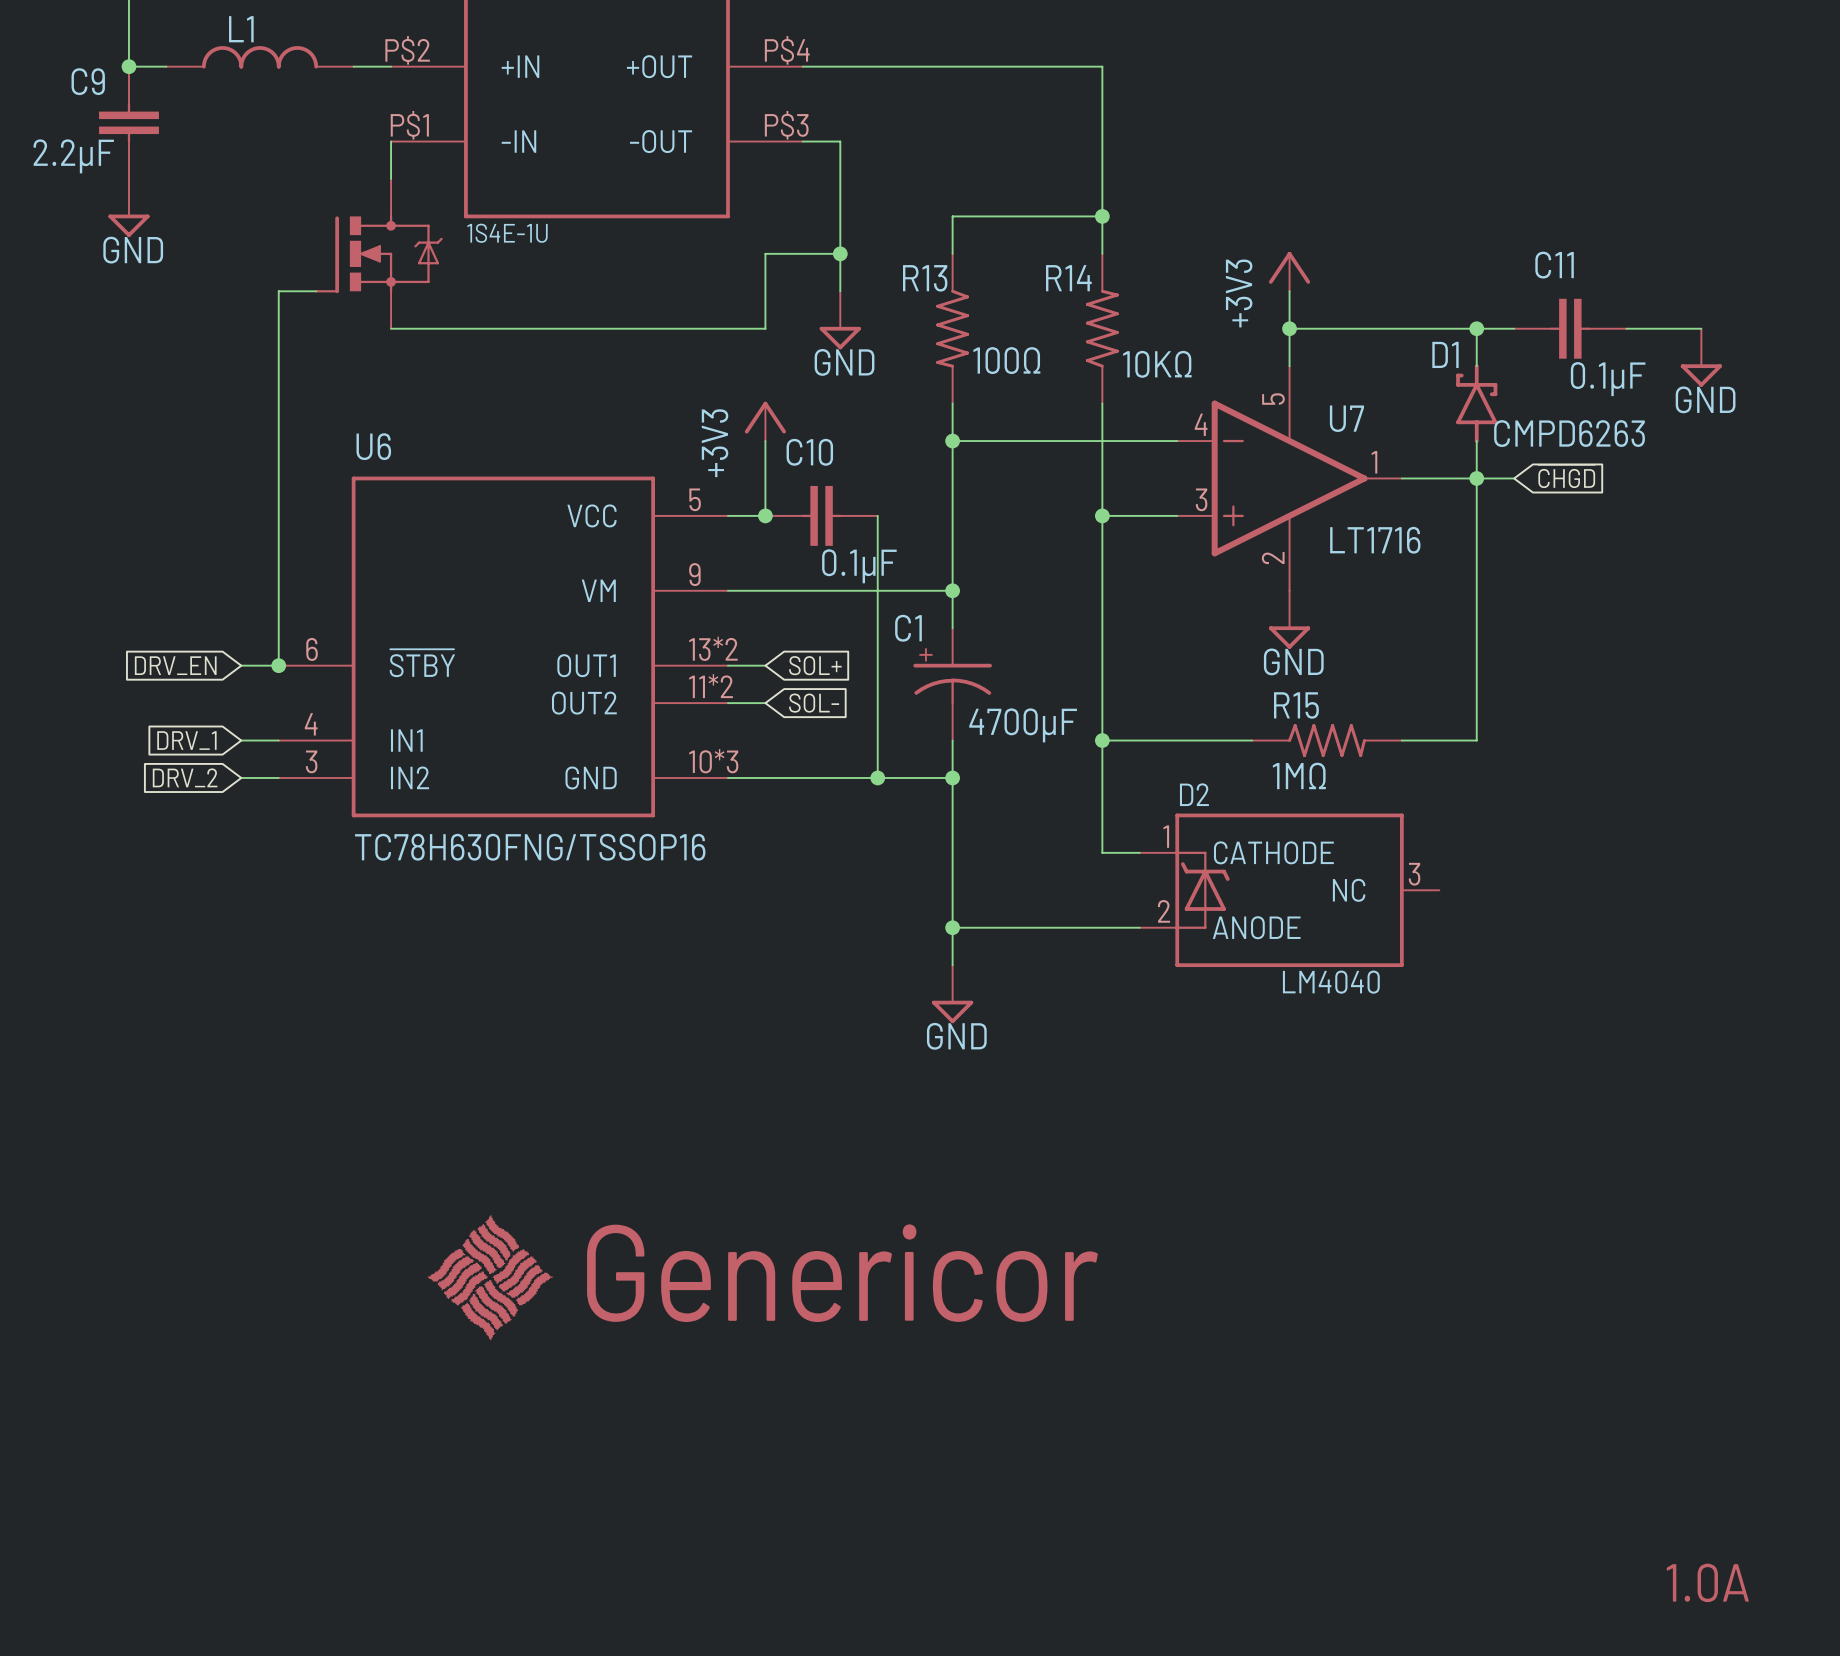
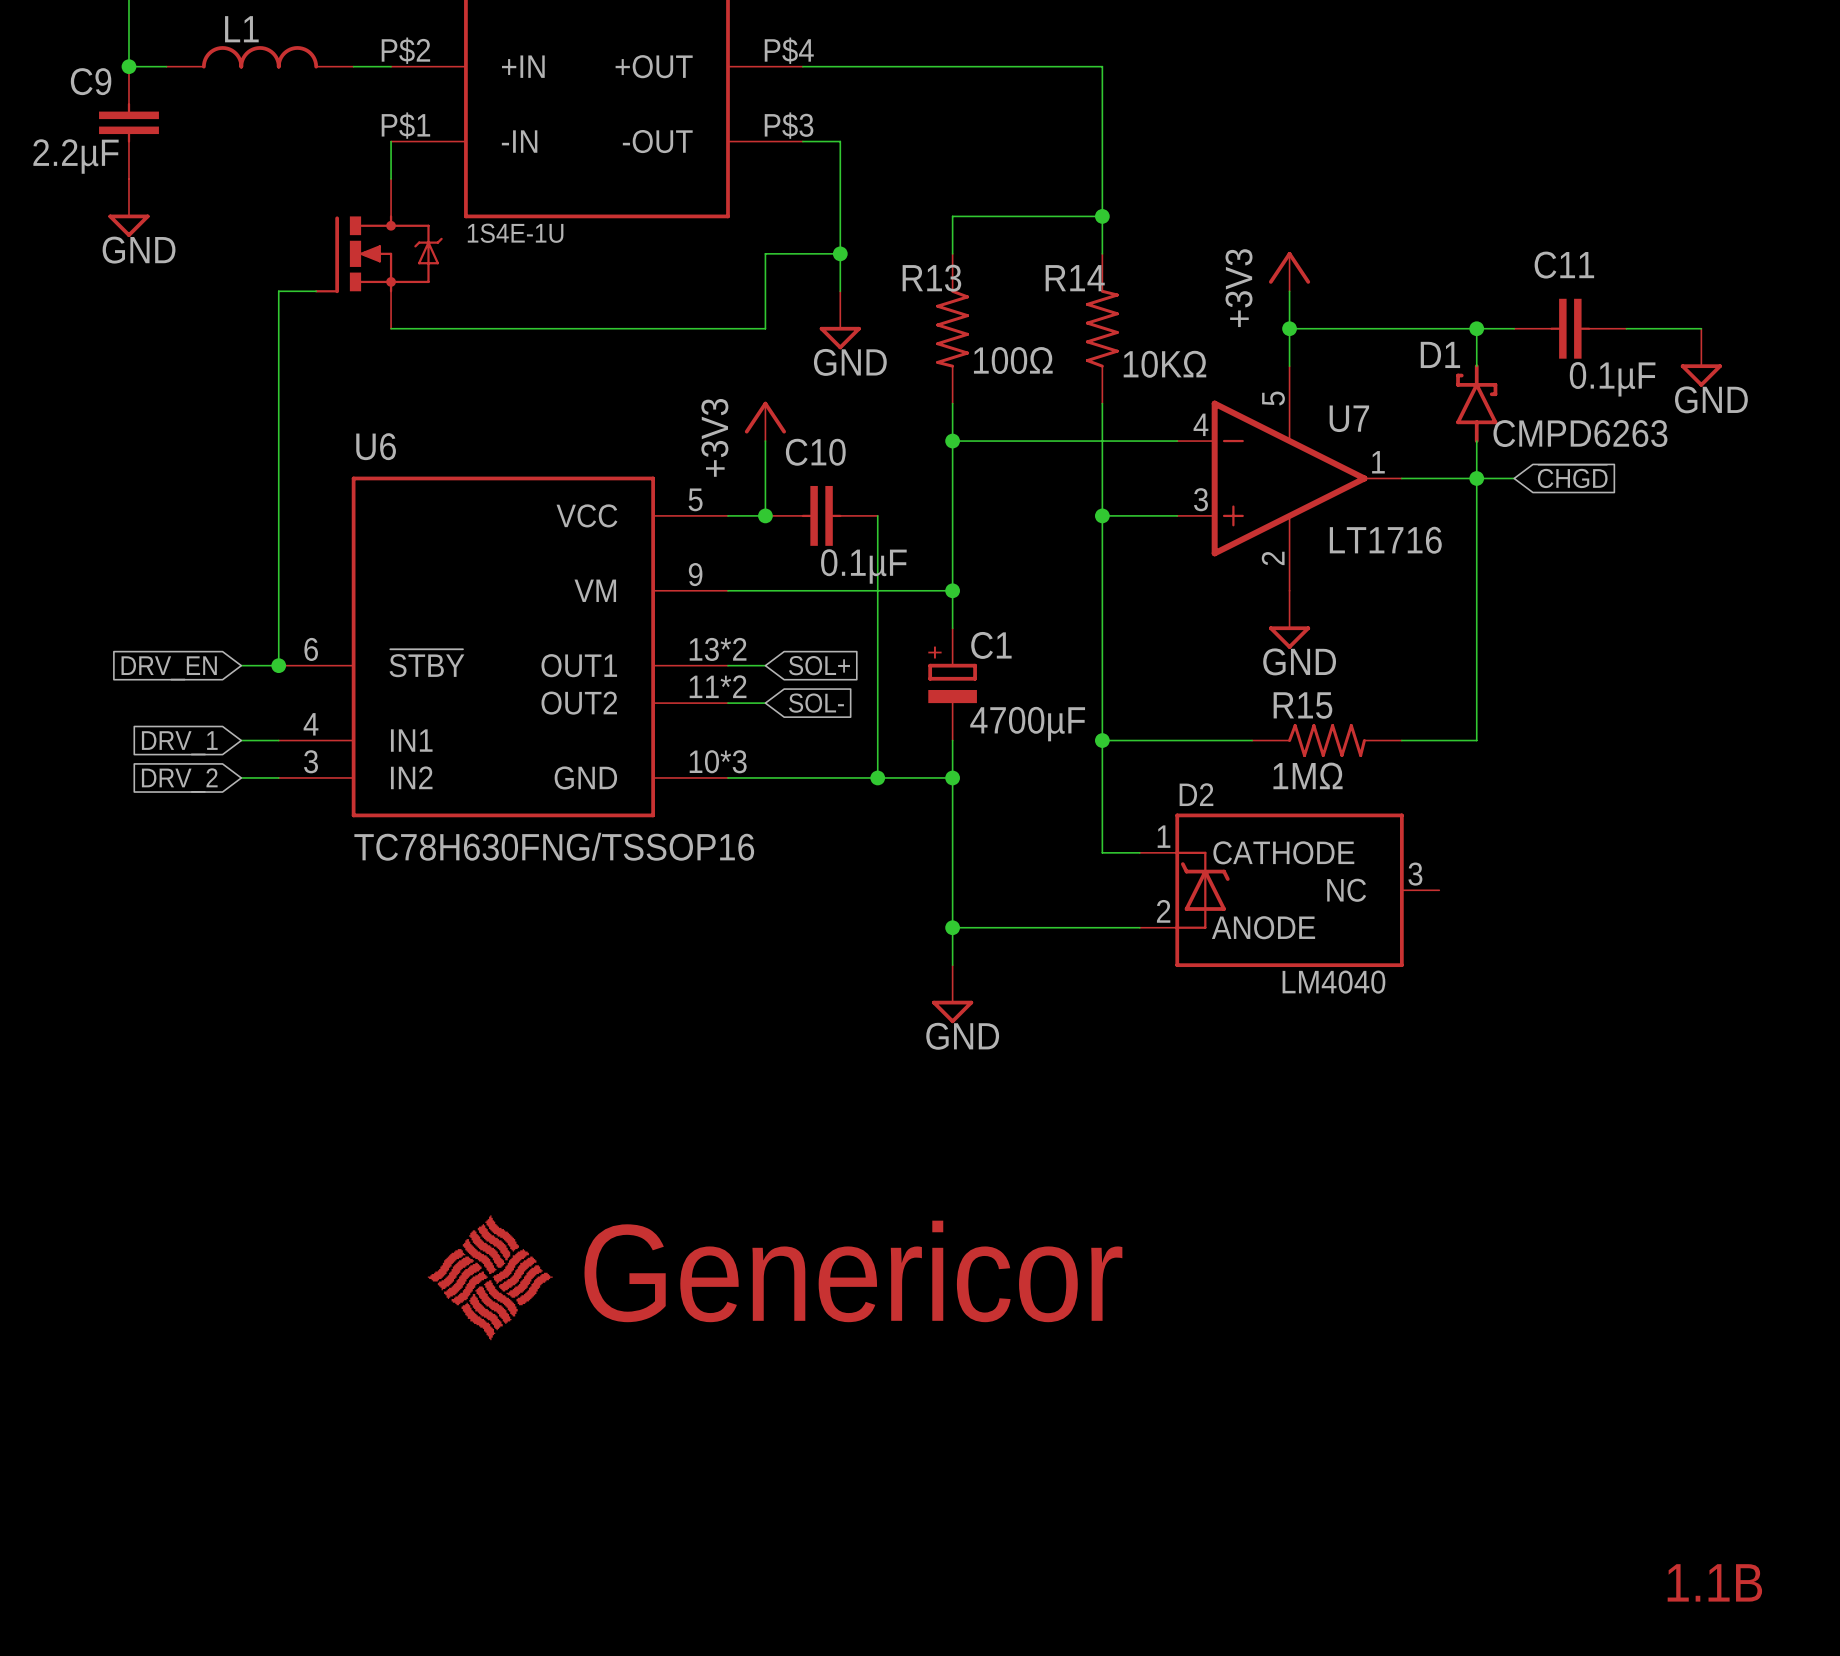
C1 name position: C1 (908, 628) -> C1 (991, 645)
C1 symbol: [913, 628, 992, 741] -> [928, 628, 977, 741]
text: 1.0A (1707, 1582) -> 1.1B (1714, 1582)

